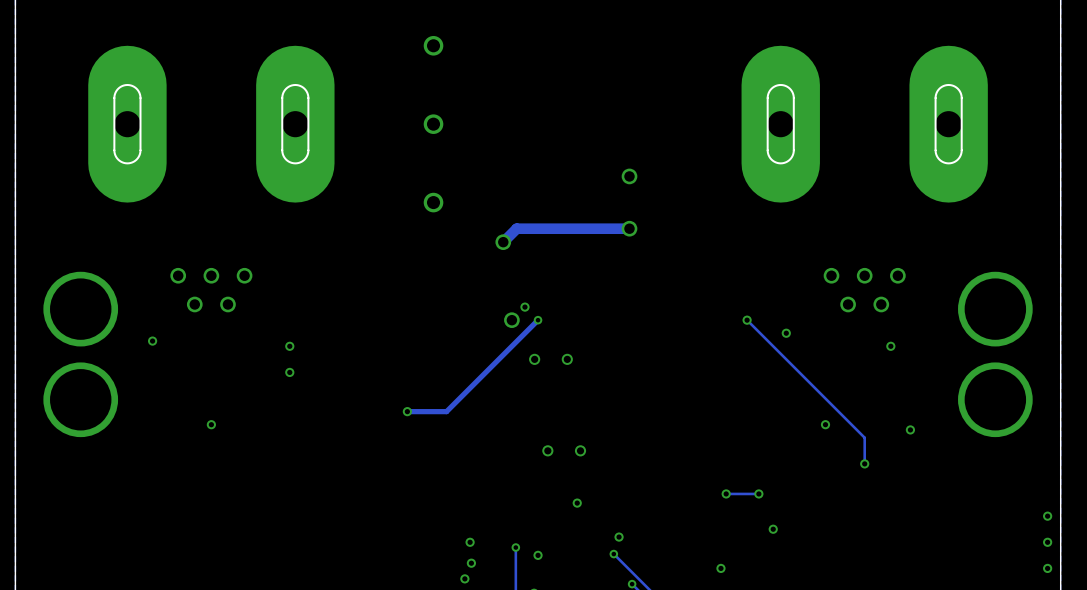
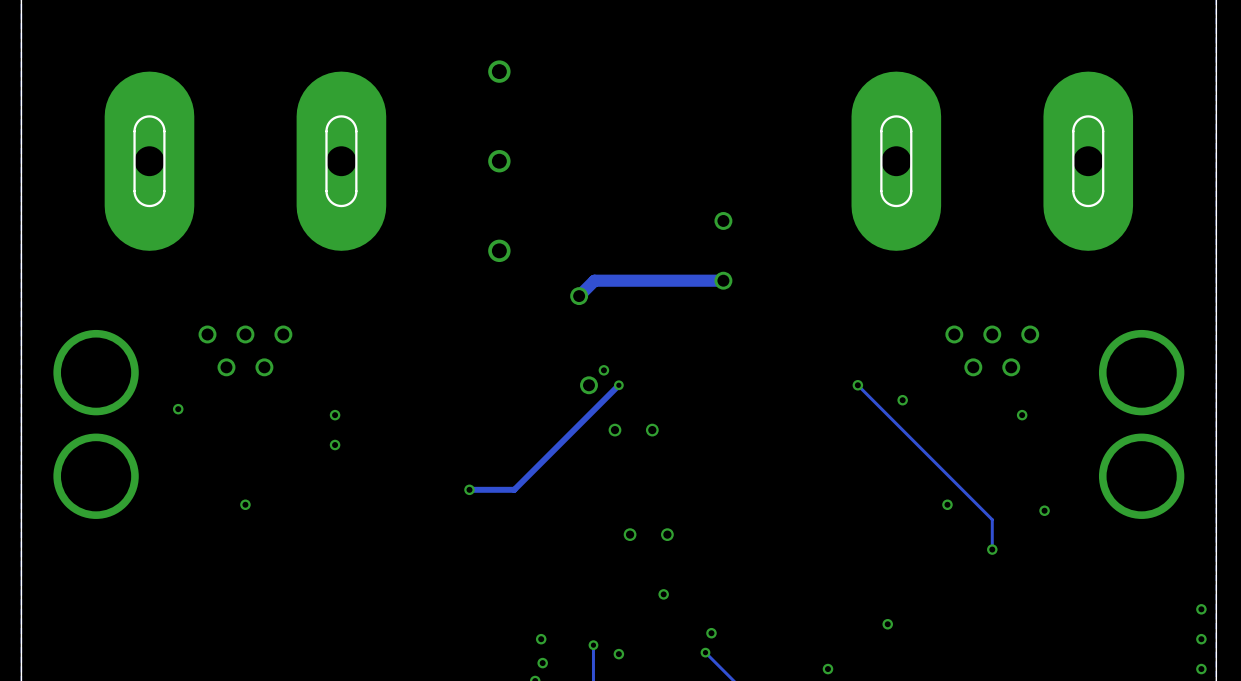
via: (726, 493) -> none
track: (758, 493) (726, 493) -> none
via: (758, 493) -> none

